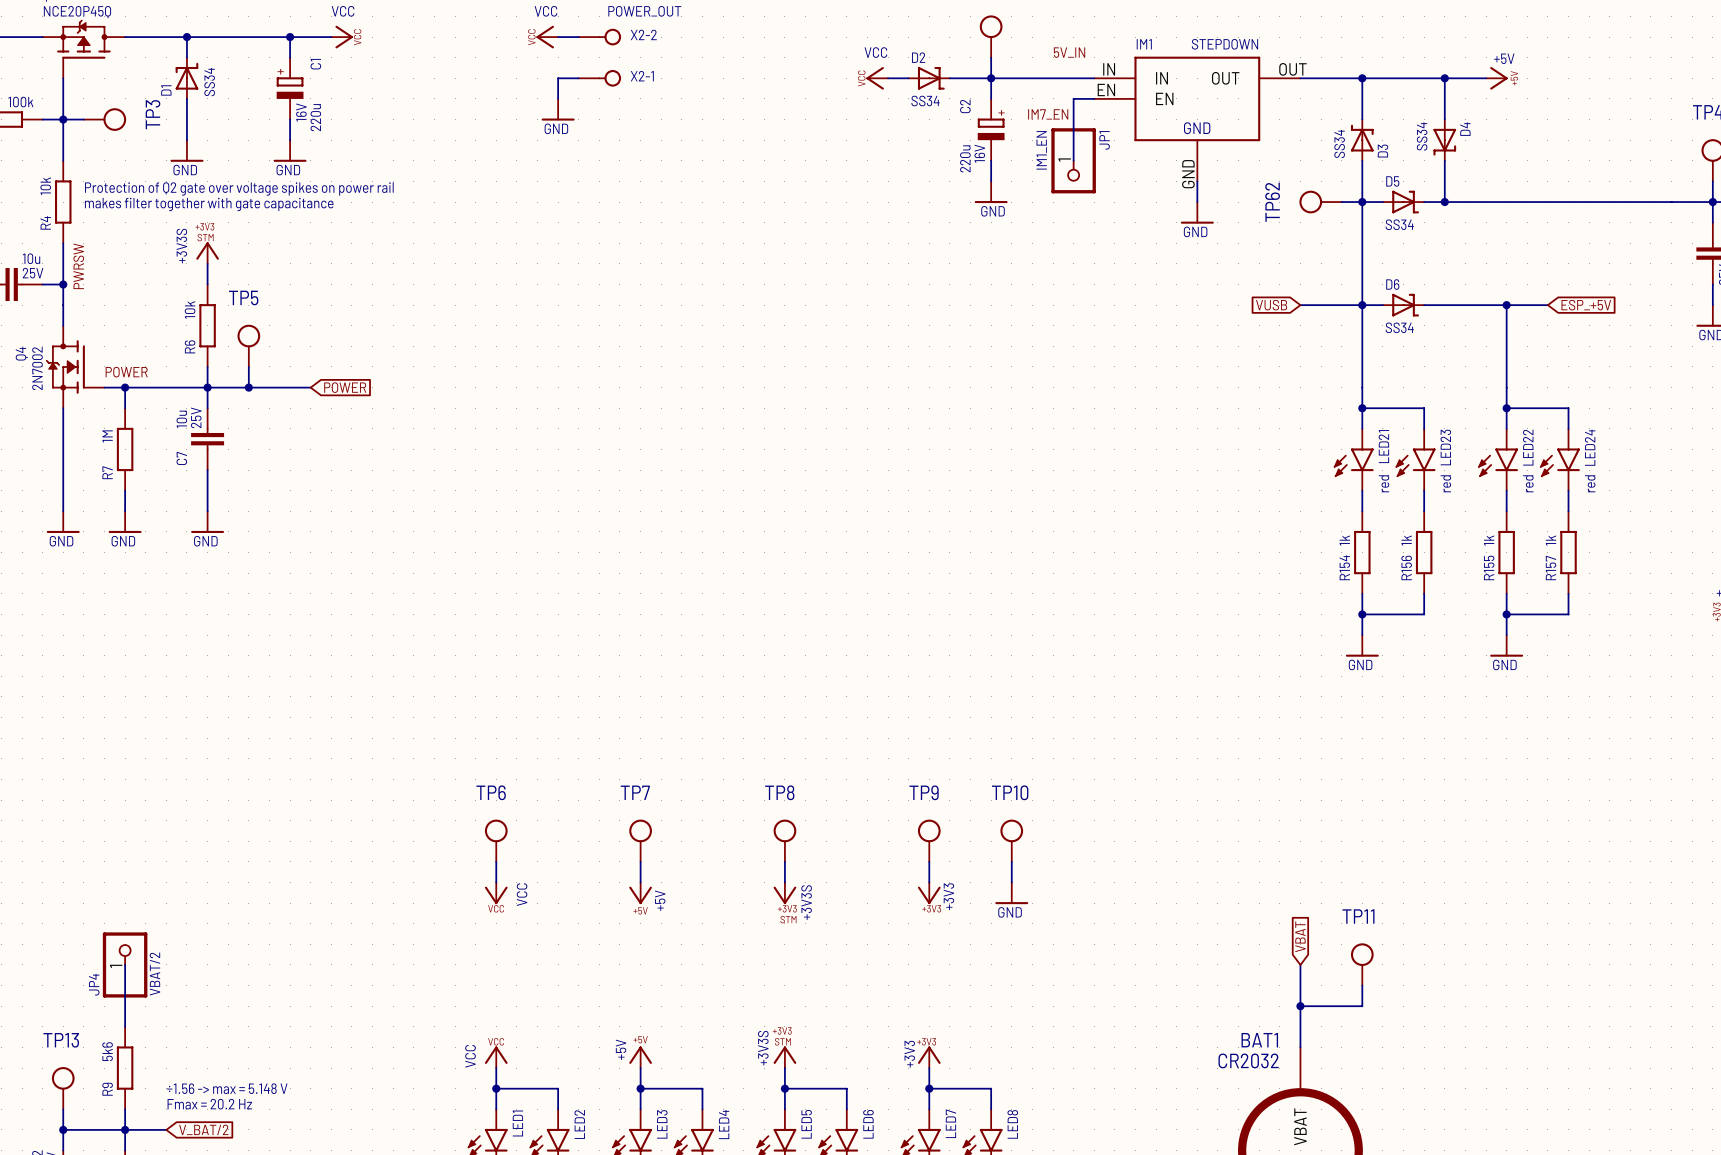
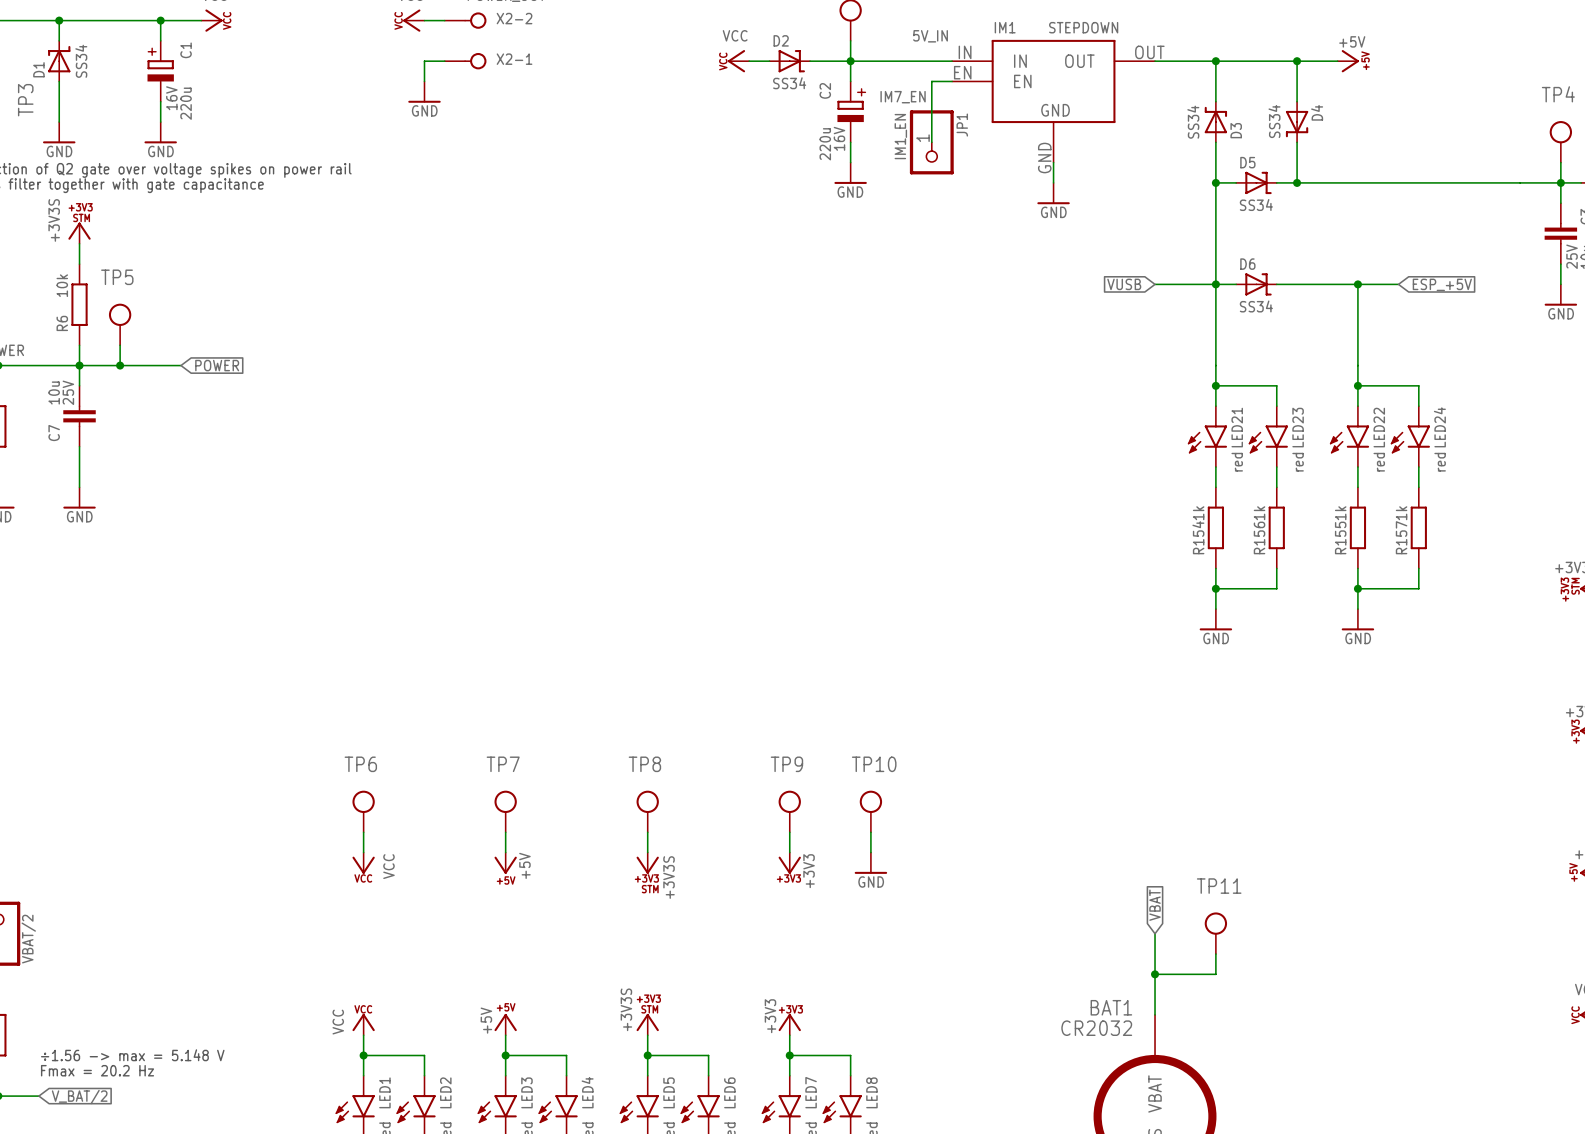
TP62: (1320, 202) -> none
wire: (1341, 202) (1362, 202) -> none

